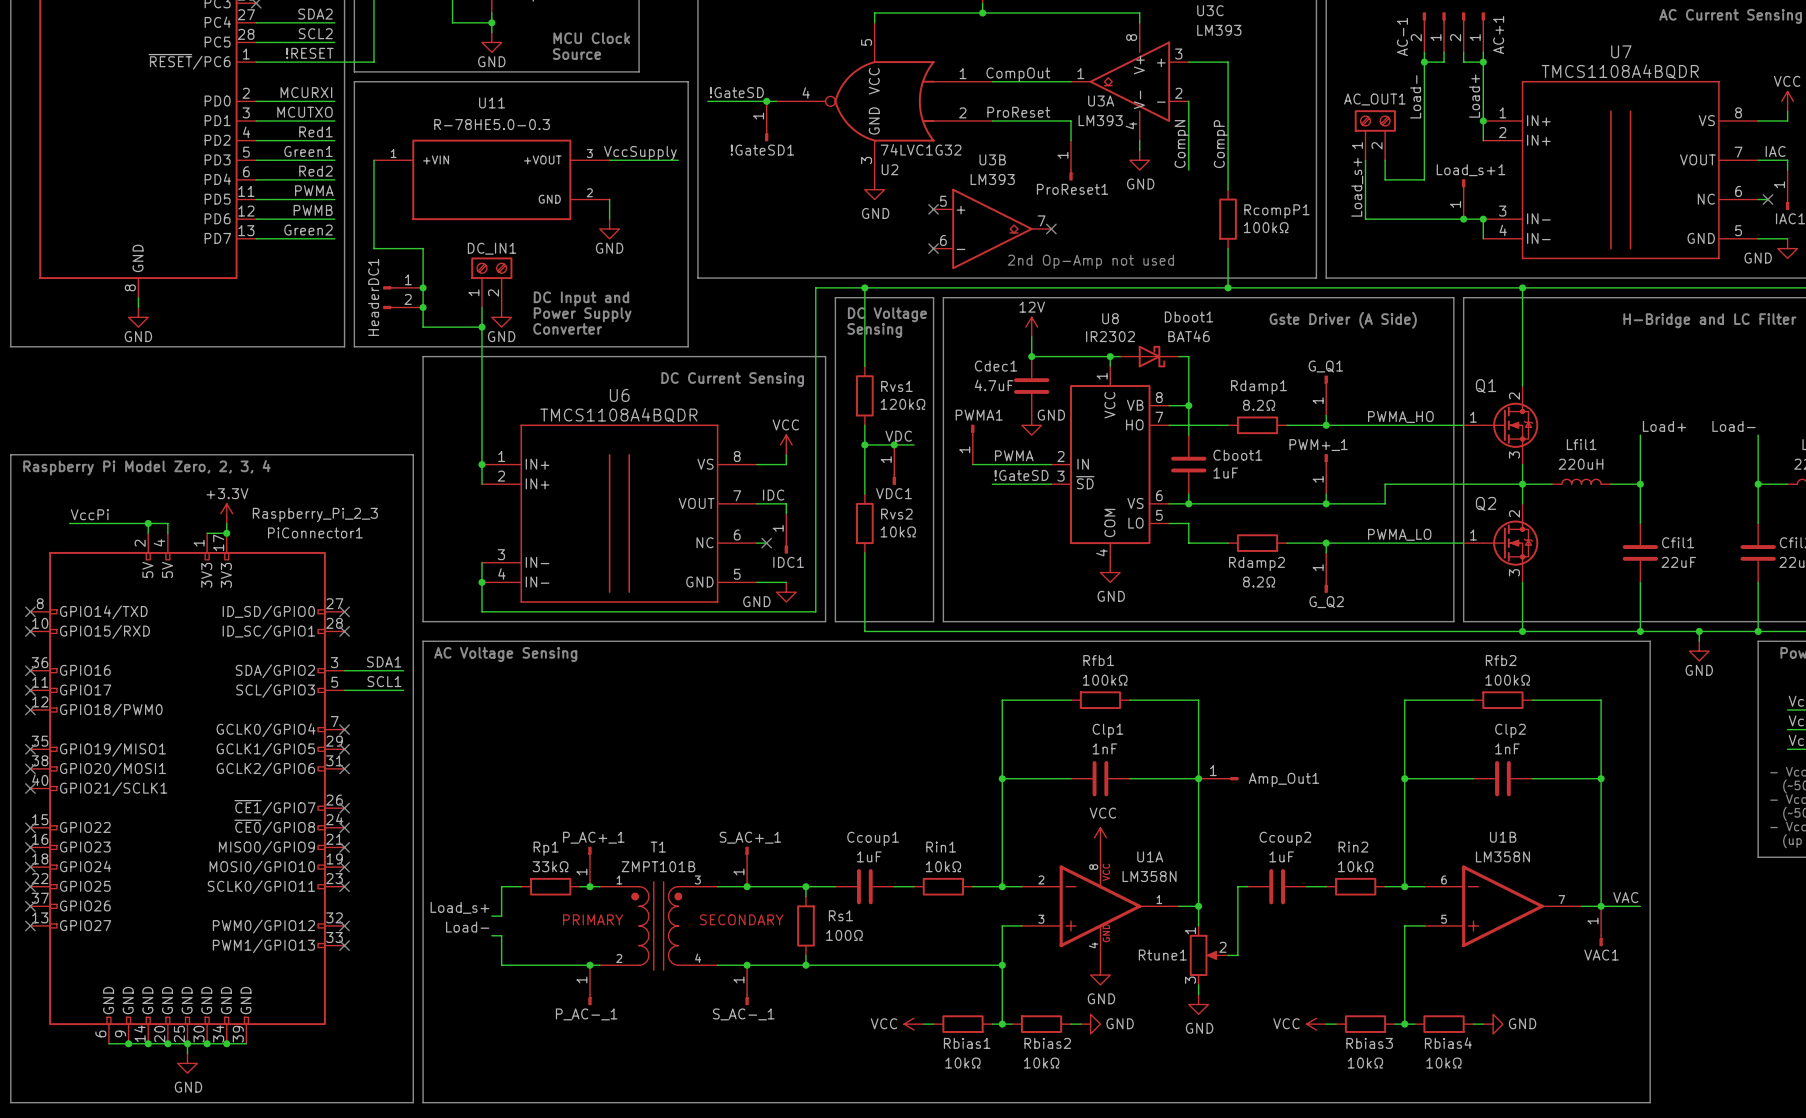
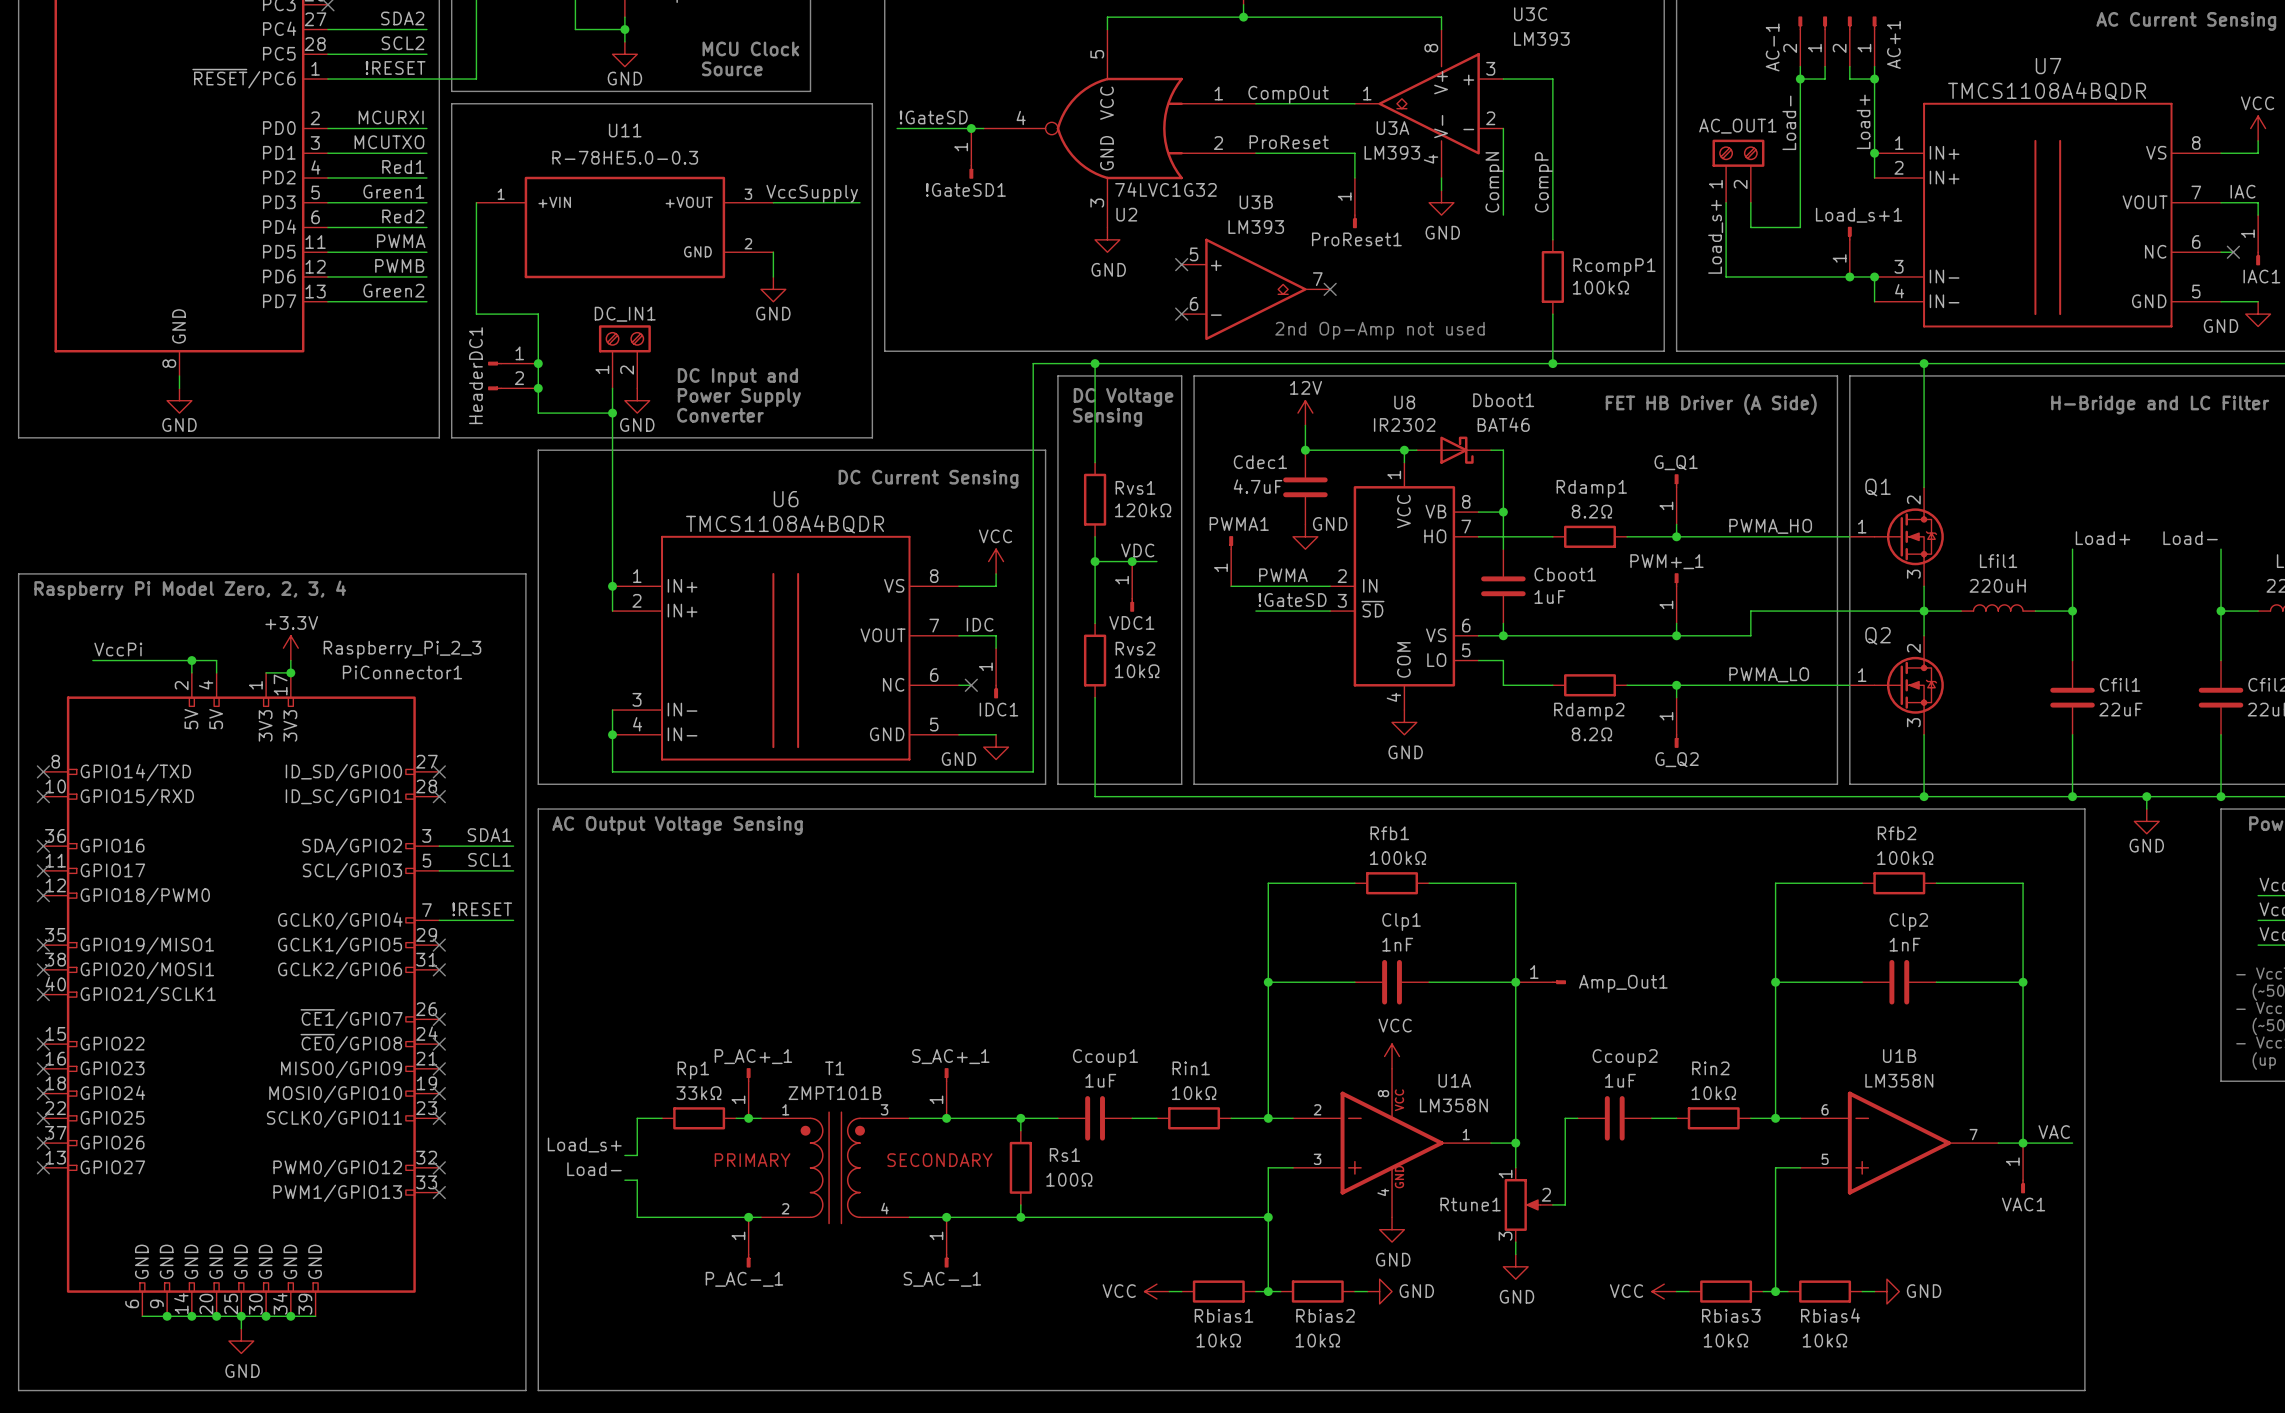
text: Gste Driver (A Side) (1343, 320) -> FET HB Driver (A Side) (1711, 404)
text: AC Voltage Sensing (505, 654) -> AC Output Voltage Sensing (677, 825)
label: none -> !RESET (482, 909)
wire: none -> (439, 920) (513, 920)
no-connect mark: (344, 729) -> none

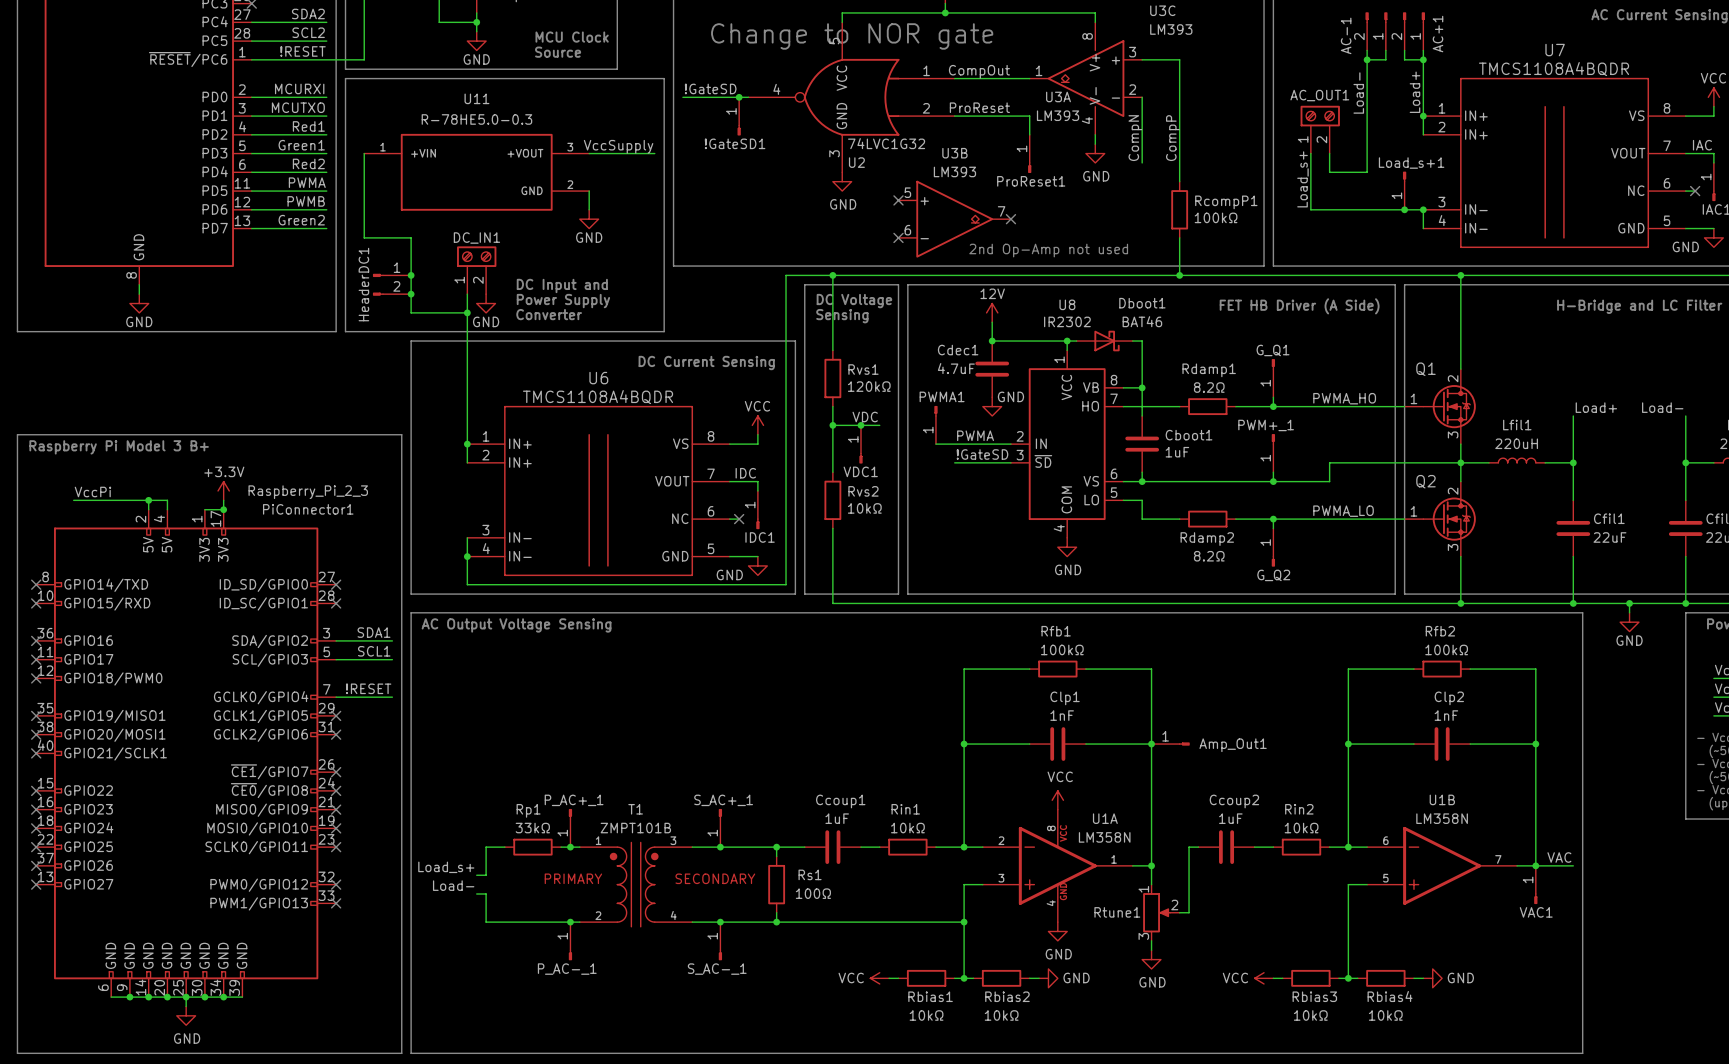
text: none -> Change to NOR gate (852, 36)
text: Raspberry Pi Model Zero, 2, 3, 4 (190, 590) -> Raspberry Pi Model 3 B+ (119, 447)

